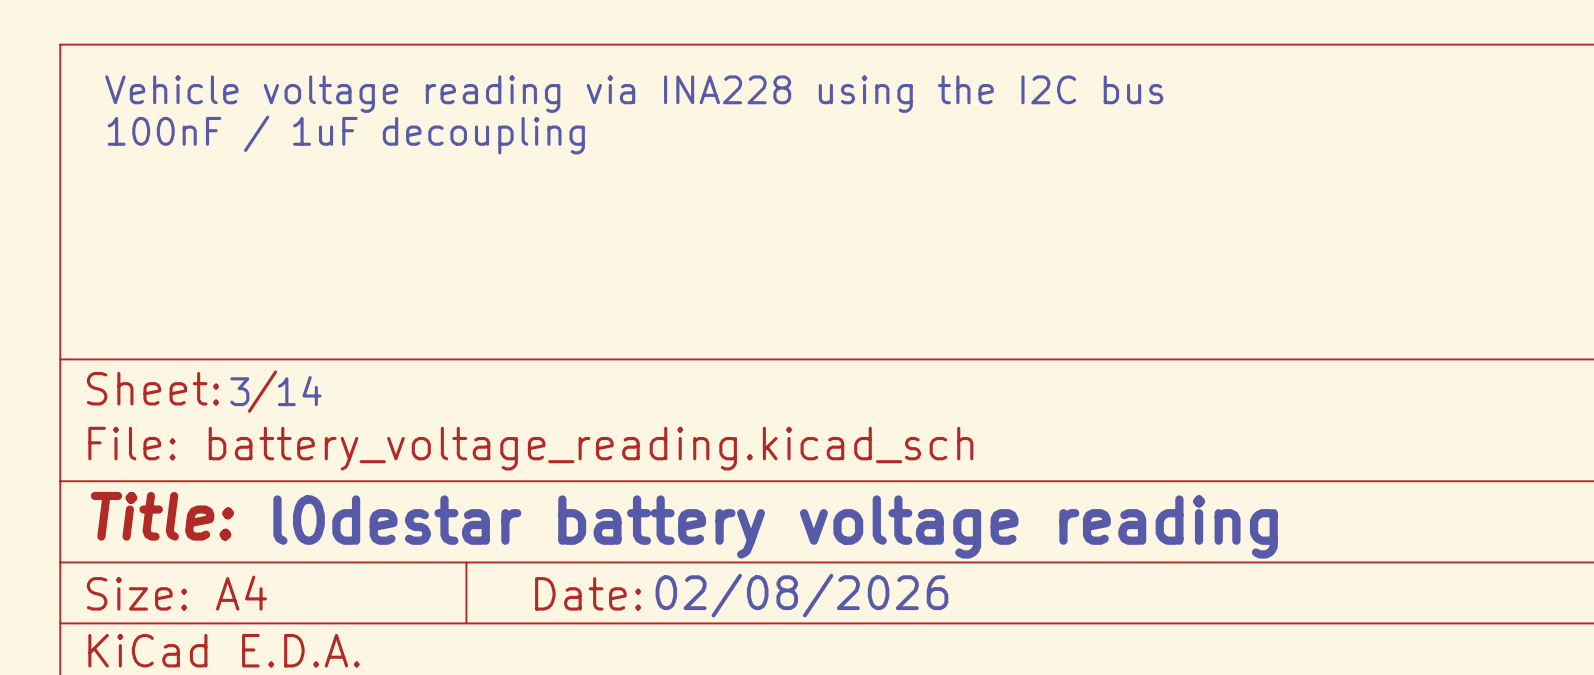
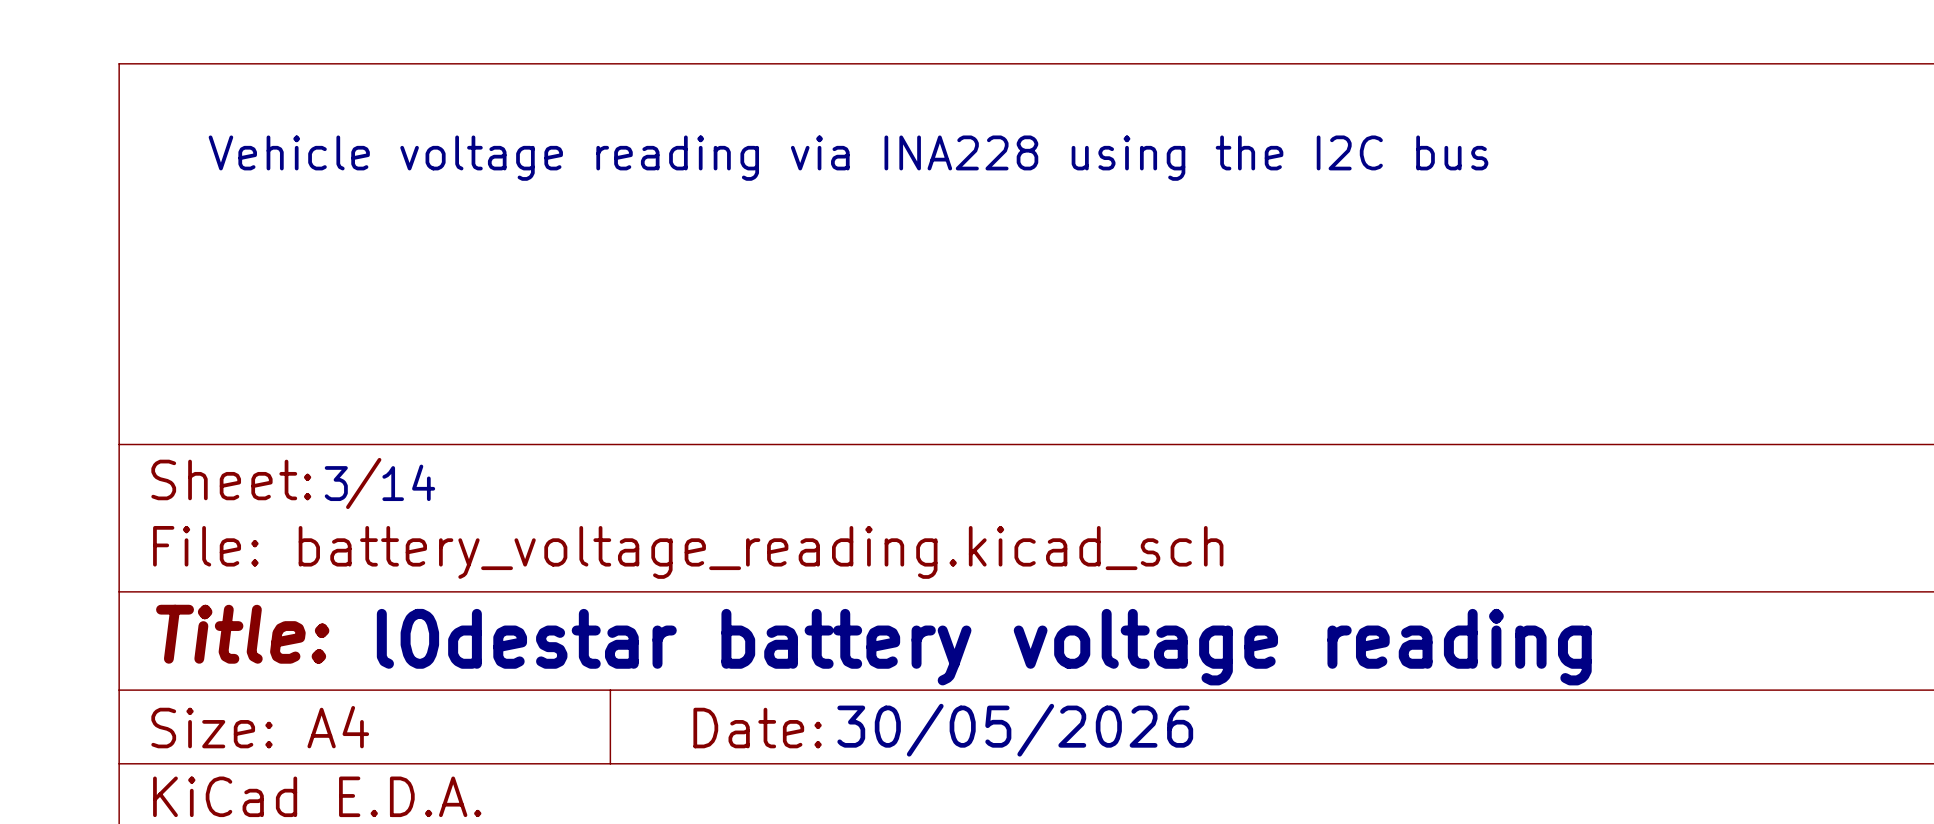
text: Vehicle voltage reading via INA228 using the I2C bus (634, 94) -> none
text: none -> Vehicle voltage reading via INA228 using the I2C bus (848, 158)
text: 100nF / 1uF decoupling (346, 135) -> none
text: 02/08/2026 (801, 595) -> 30/05/2026 (1015, 730)

